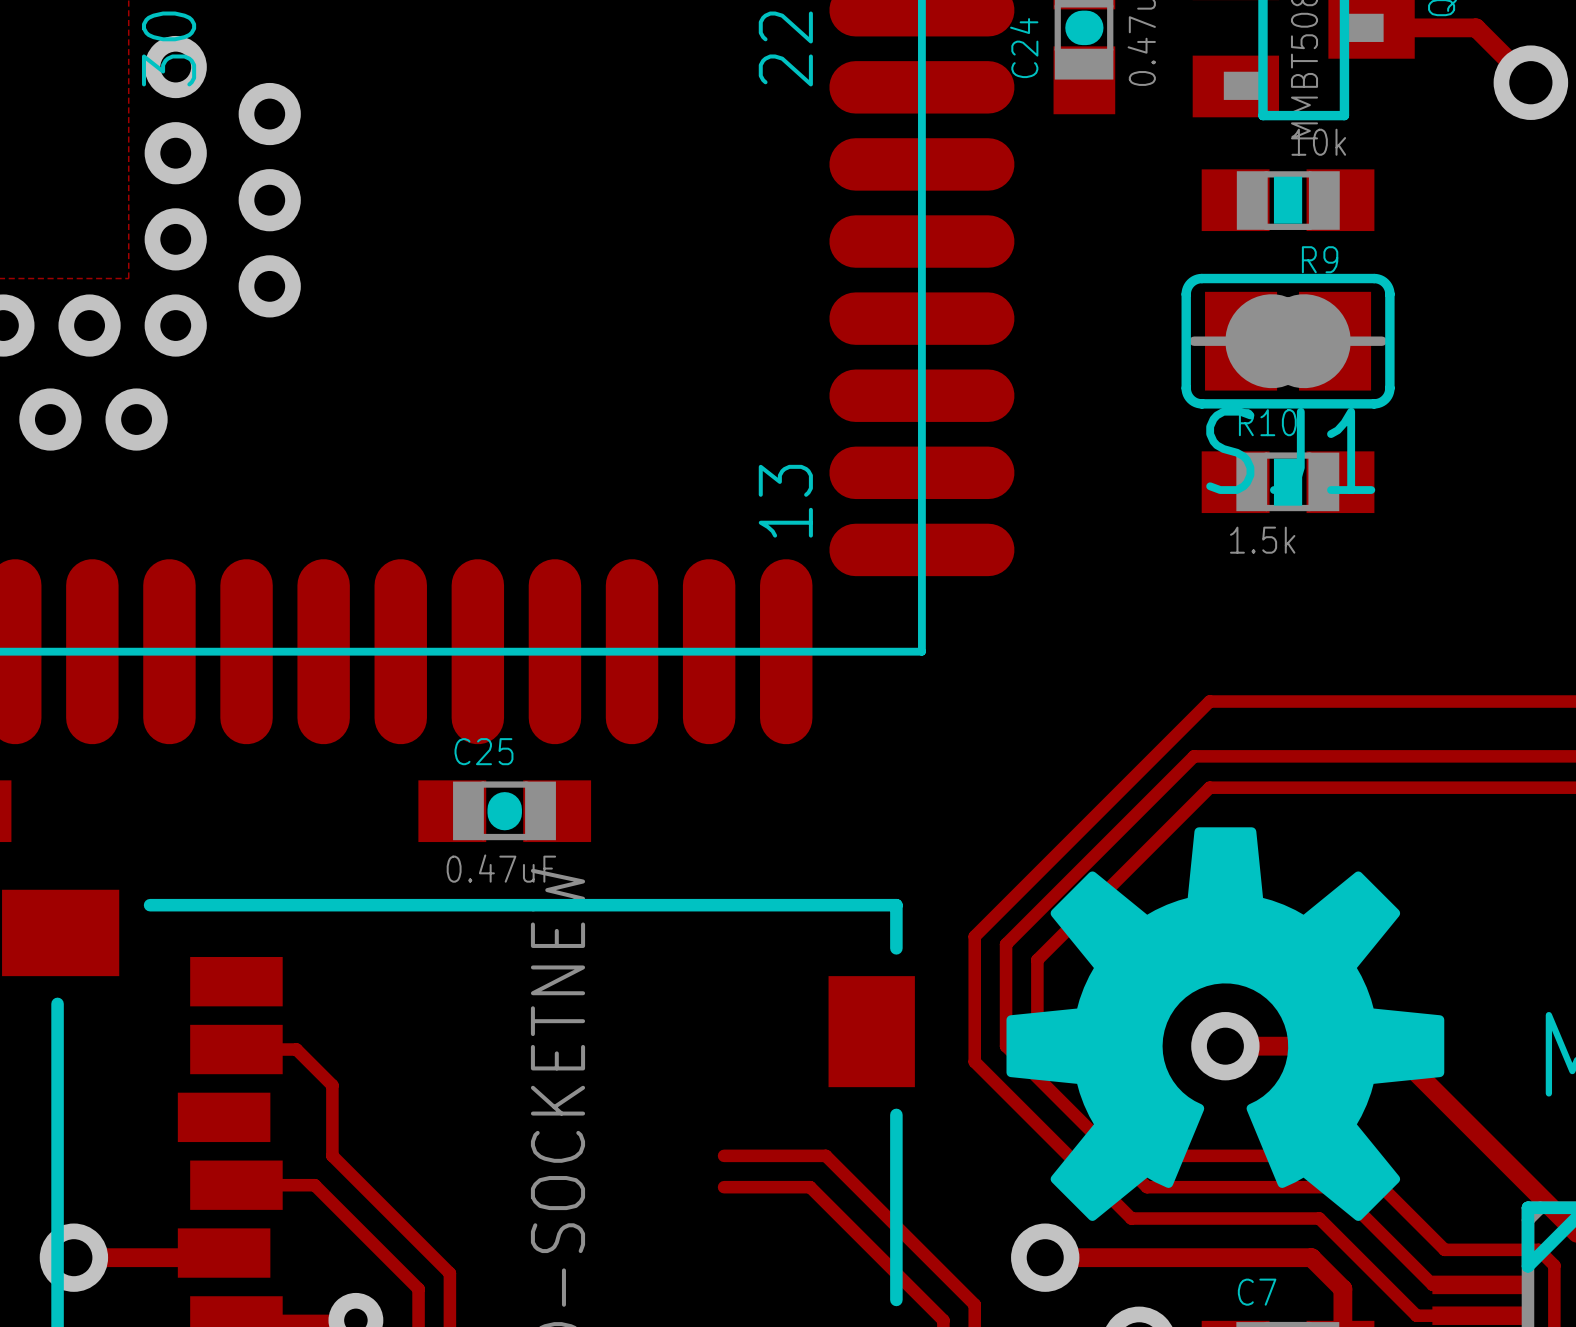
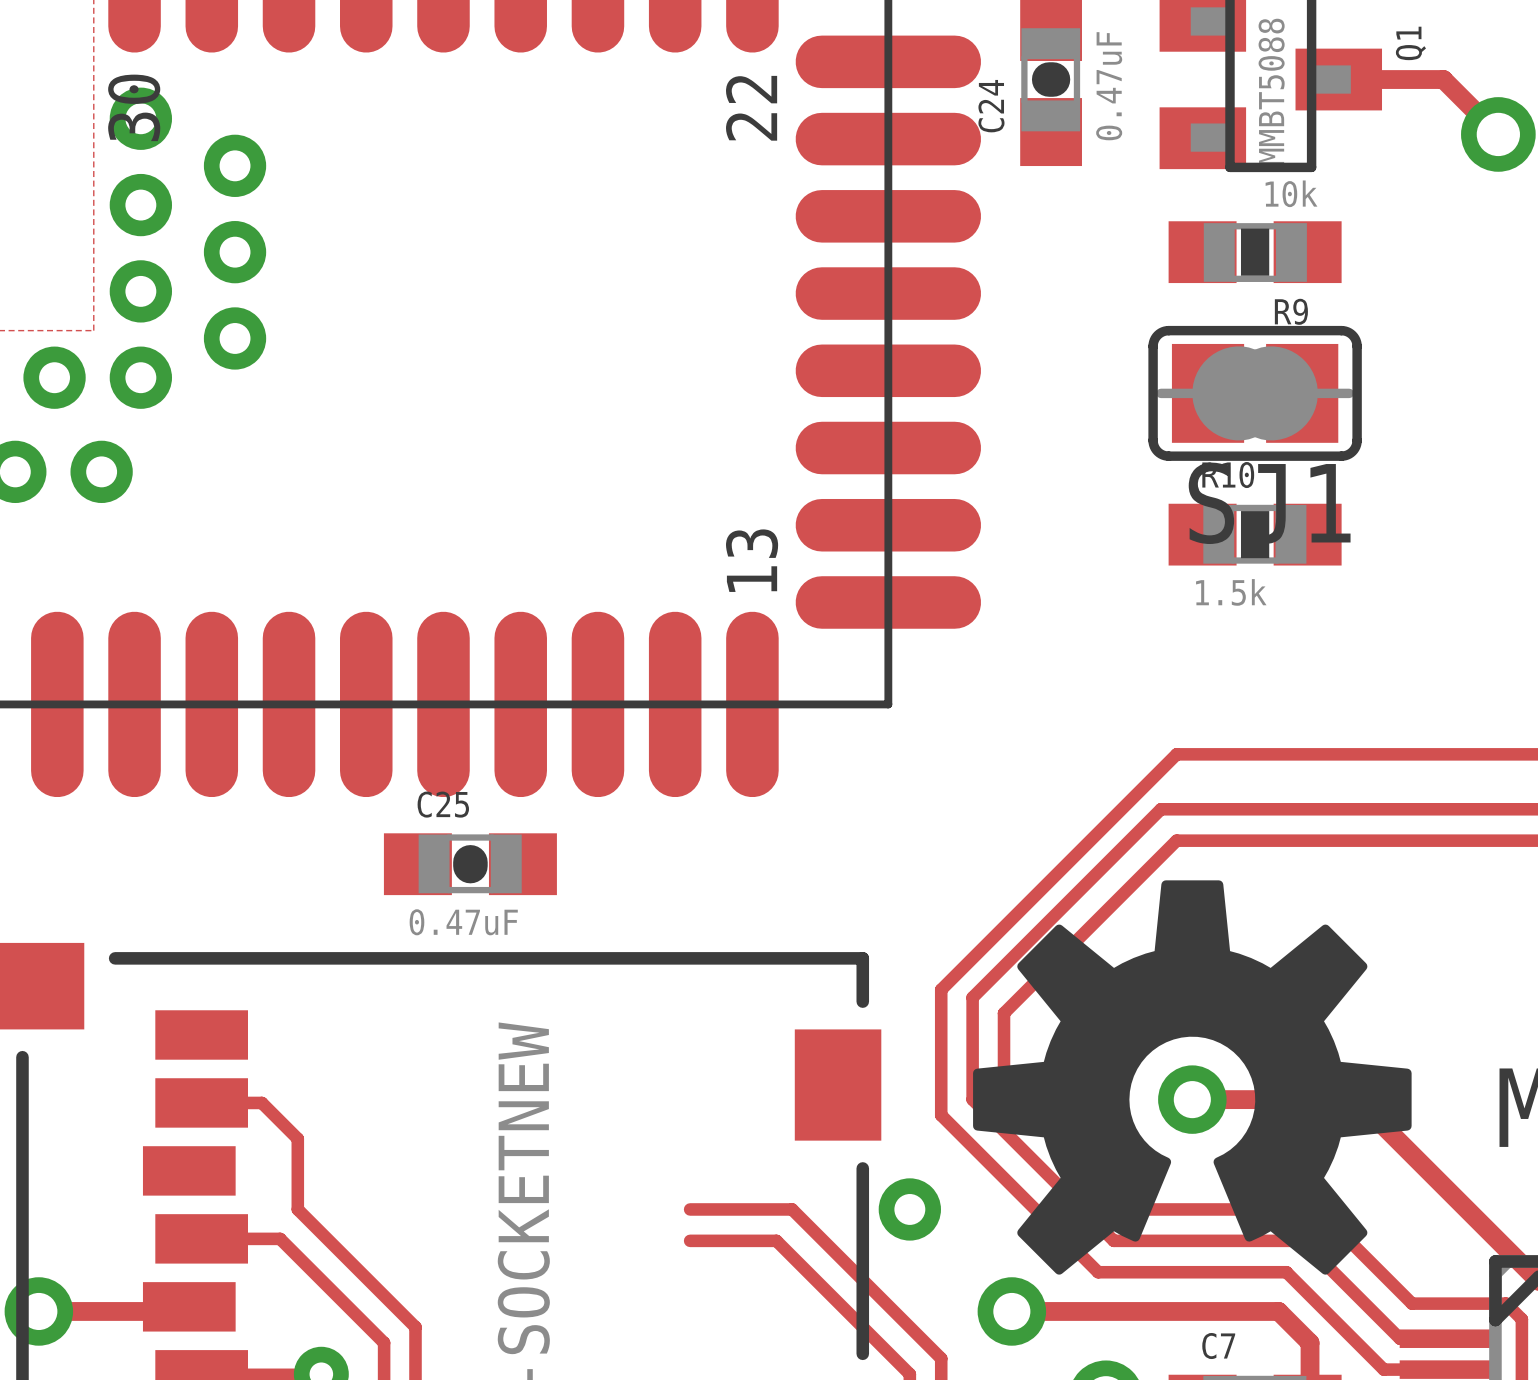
via: none -> (909, 1209)

